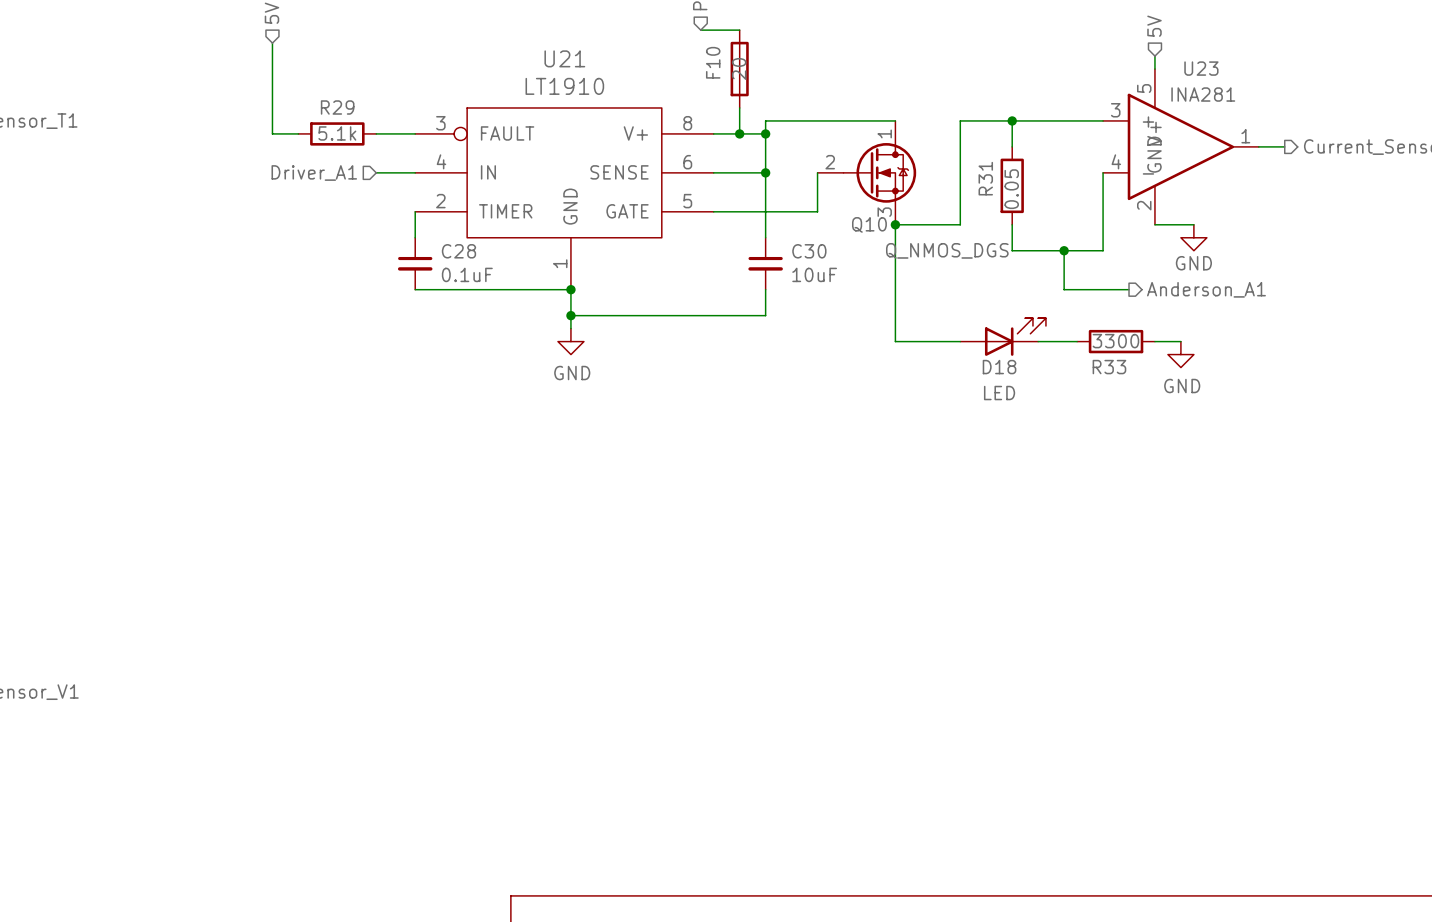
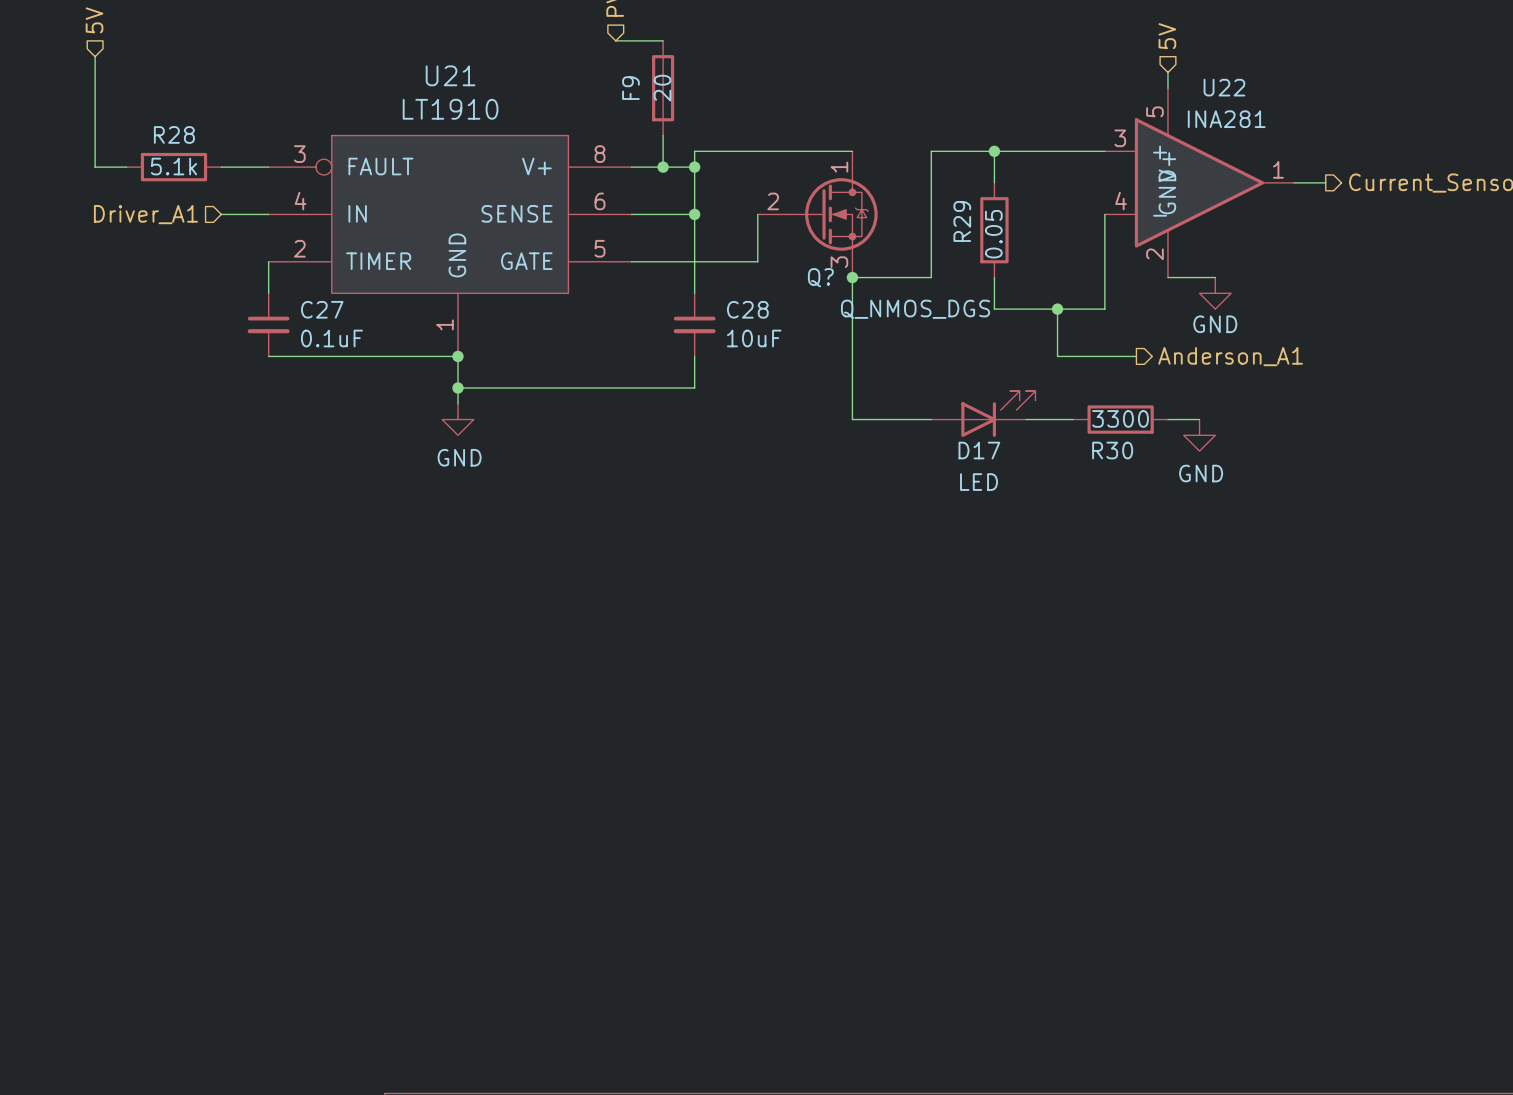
F10 name: F10 (713, 62) -> F9 (630, 88)
U23 name: U23 (1201, 68) -> U22 (1224, 87)
R29 name: R29 (337, 107) -> R28 (174, 134)
R31 name: R31 (985, 178) -> R29 (962, 221)
Q10 name: Q10 (869, 224) -> Q? (820, 277)
C28 name: C28 (458, 251) -> C27 (322, 309)
C30 name: C30 (809, 251) -> C28 (747, 309)
D18 name: D18 (999, 367) -> D17 (979, 450)
R33 name: R33 (1109, 367) -> R30 (1112, 450)

